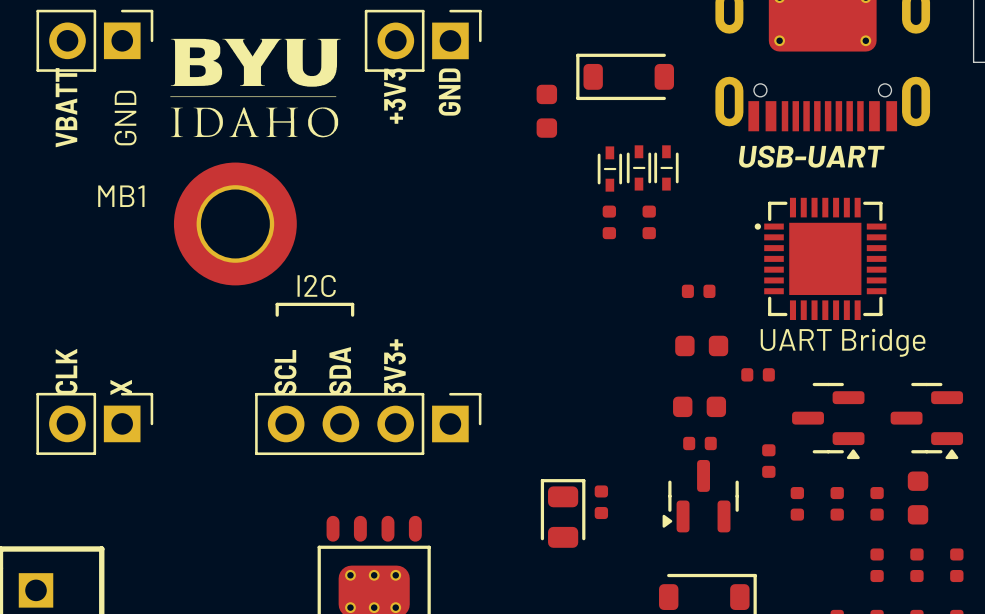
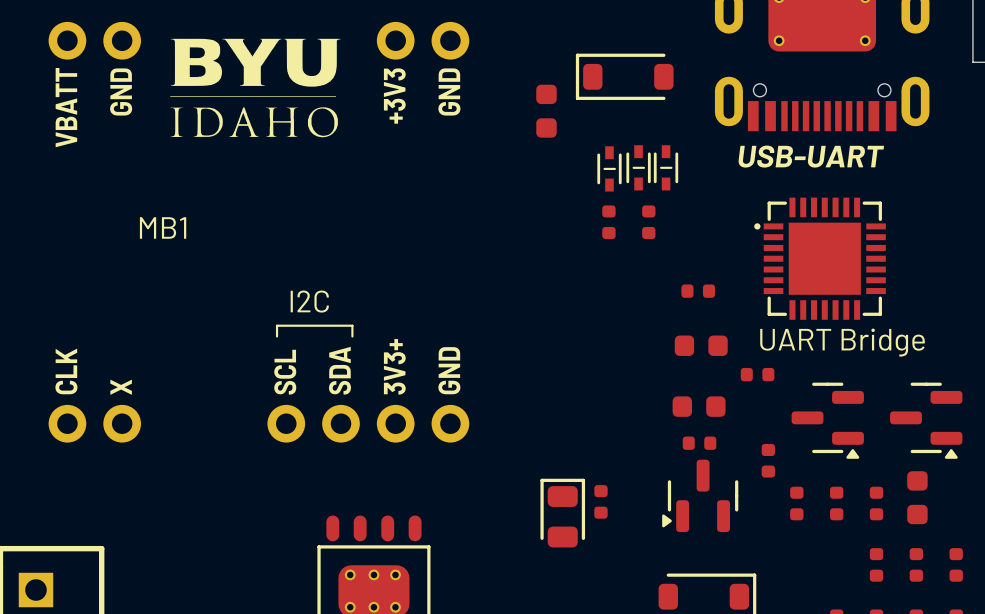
MB1 footprint: [36, 9, 482, 456] -> [48, 21, 470, 443]
MB1 name position: MB1 (121, 196) -> MB1 (163, 227)
part: (235, 223) -> none

